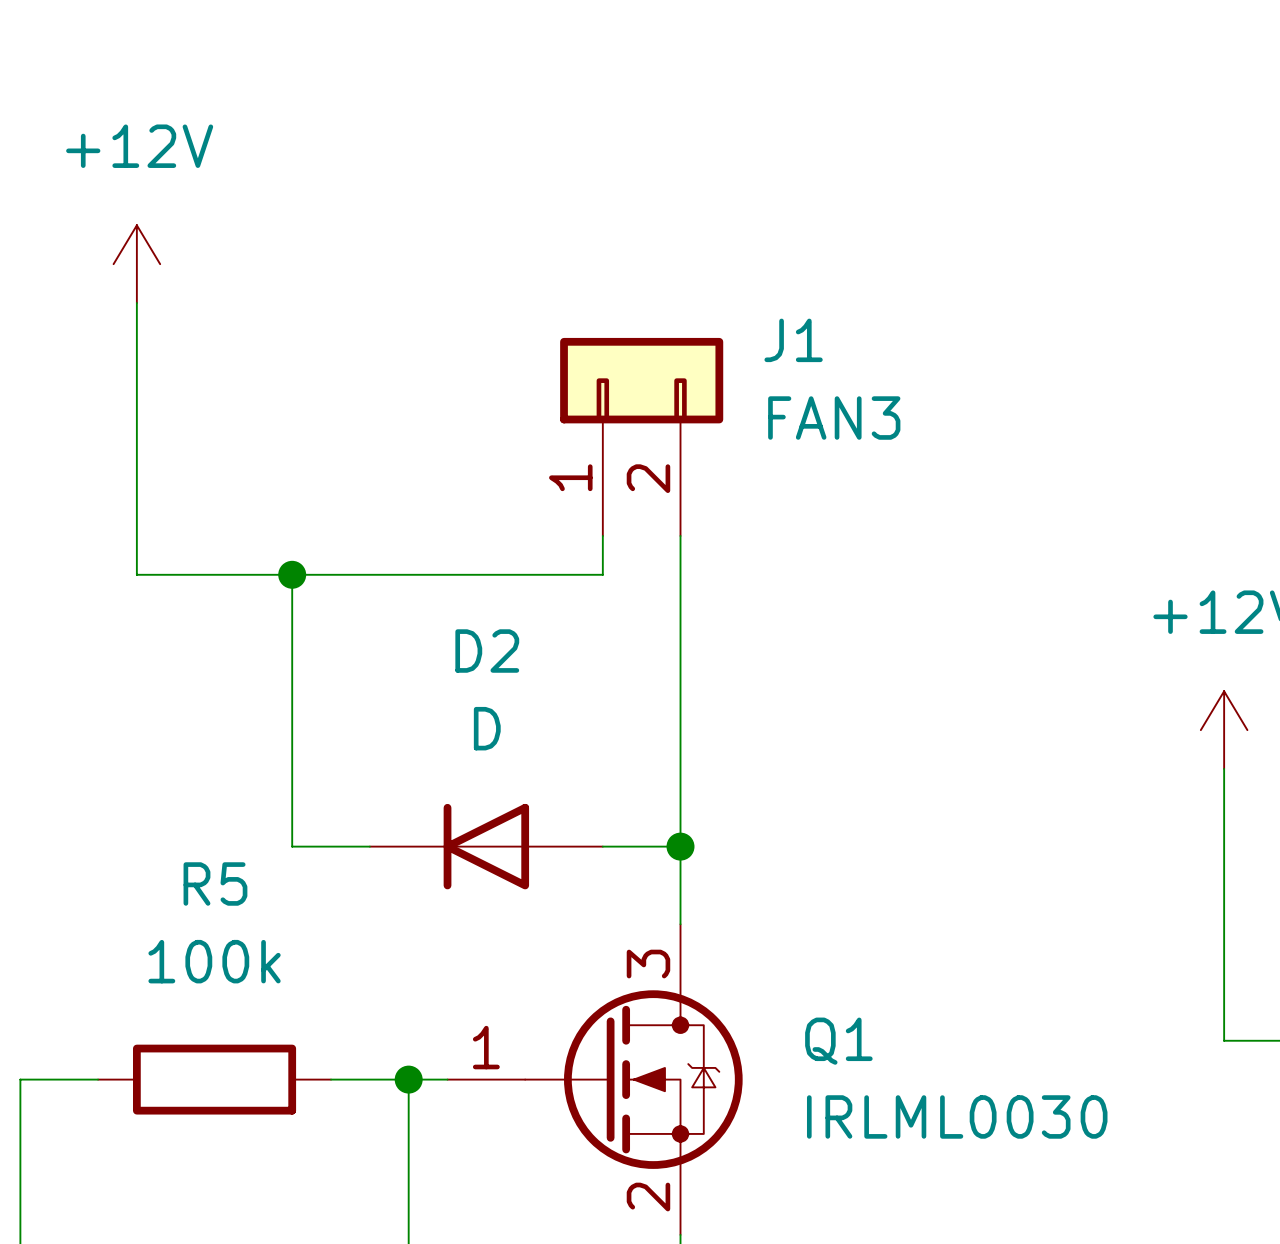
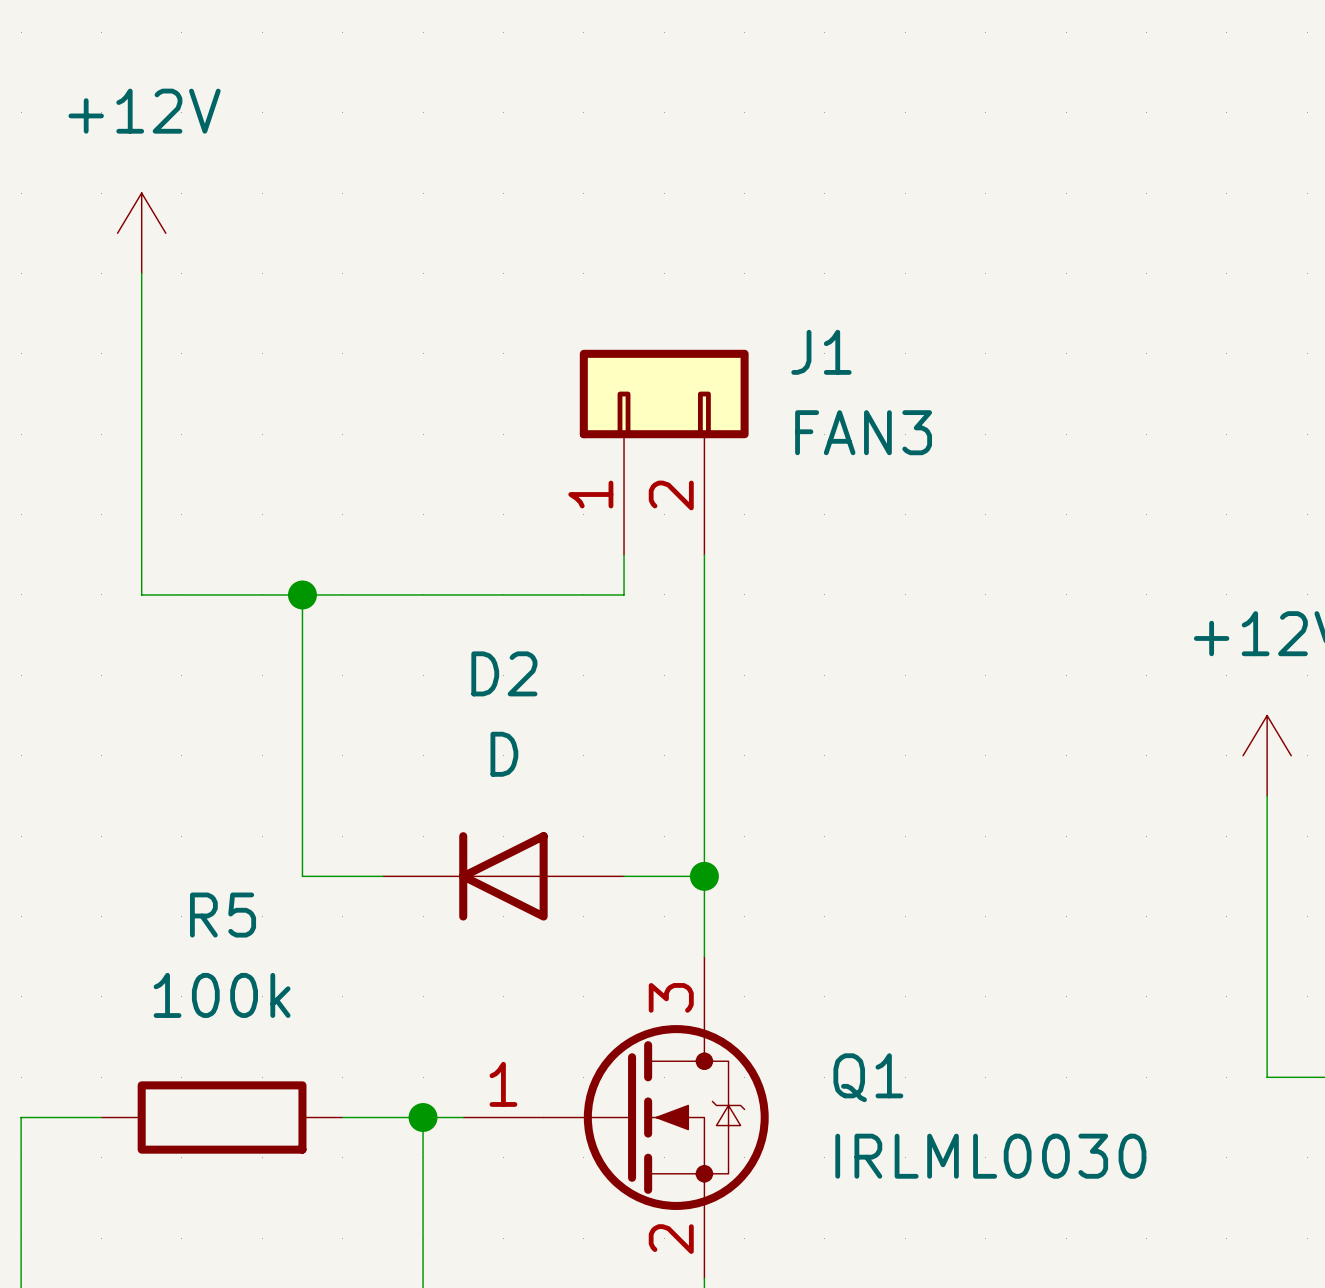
power symbol position: +12V (136, 264) -> +12V (141, 233)

